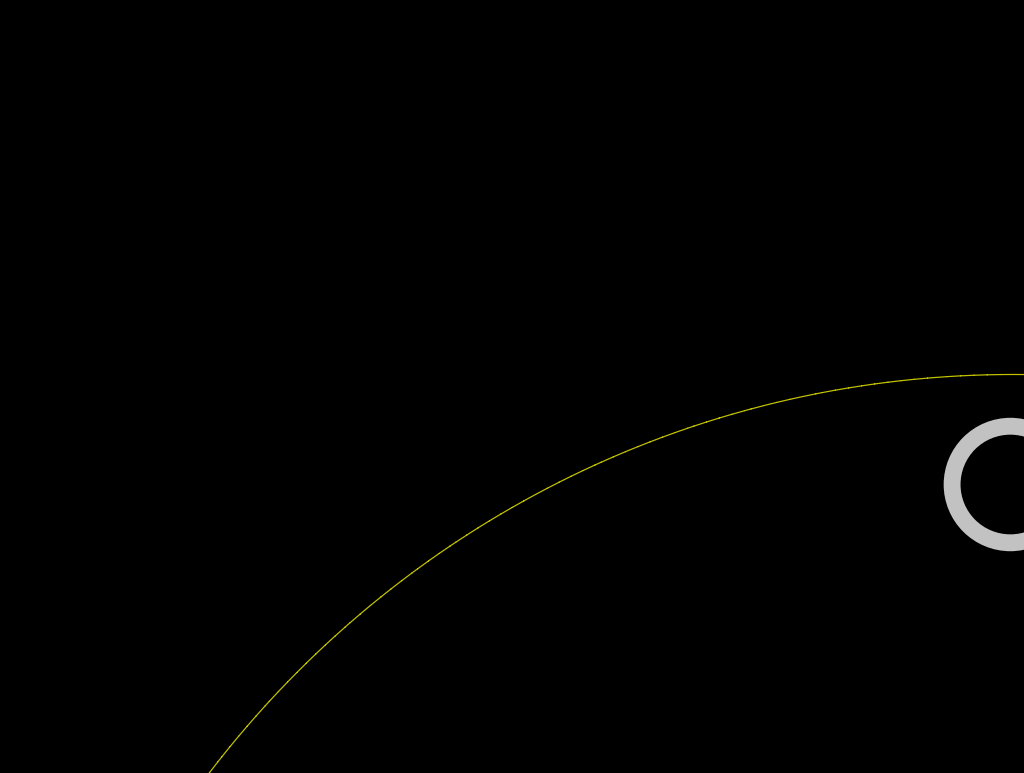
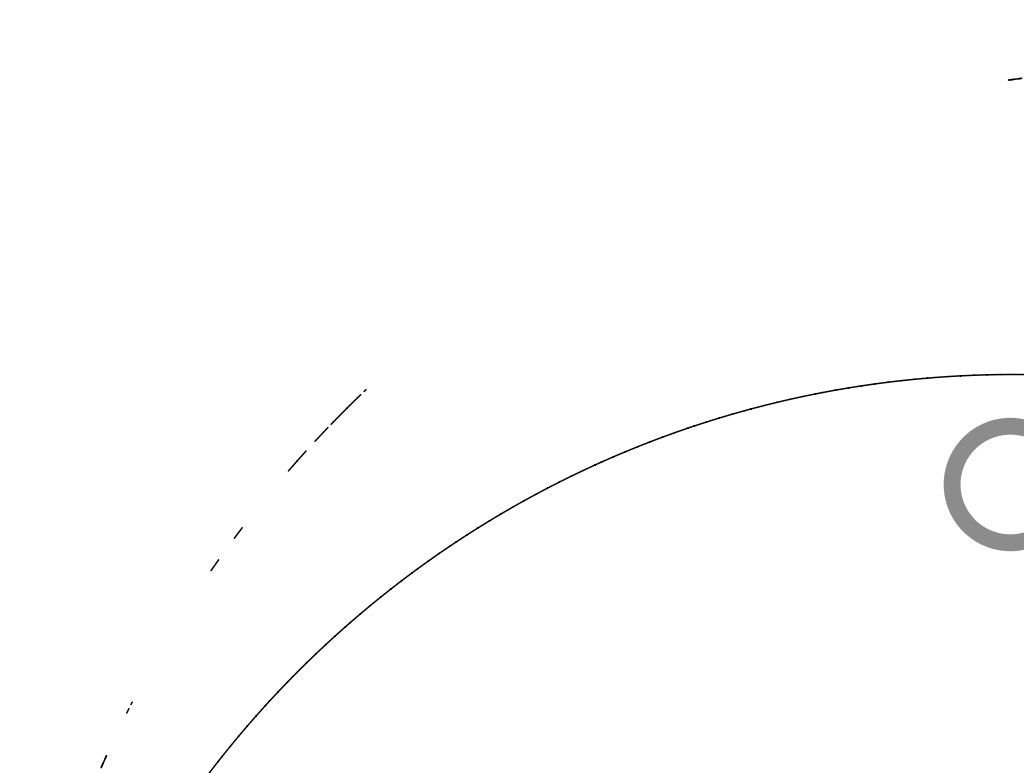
board edge: none -> (1021, 78) (1008, 80) (1021, 78)
board edge: none -> (366, 389) (315, 441)
board edge: none -> (306, 451) (288, 470)
board edge: none -> (242, 527) (234, 538)
board edge: none -> (218, 559) (211, 570)
board edge: none -> (132, 701) (126, 713)
board edge: none -> (106, 755) (101, 767) (106, 755)

